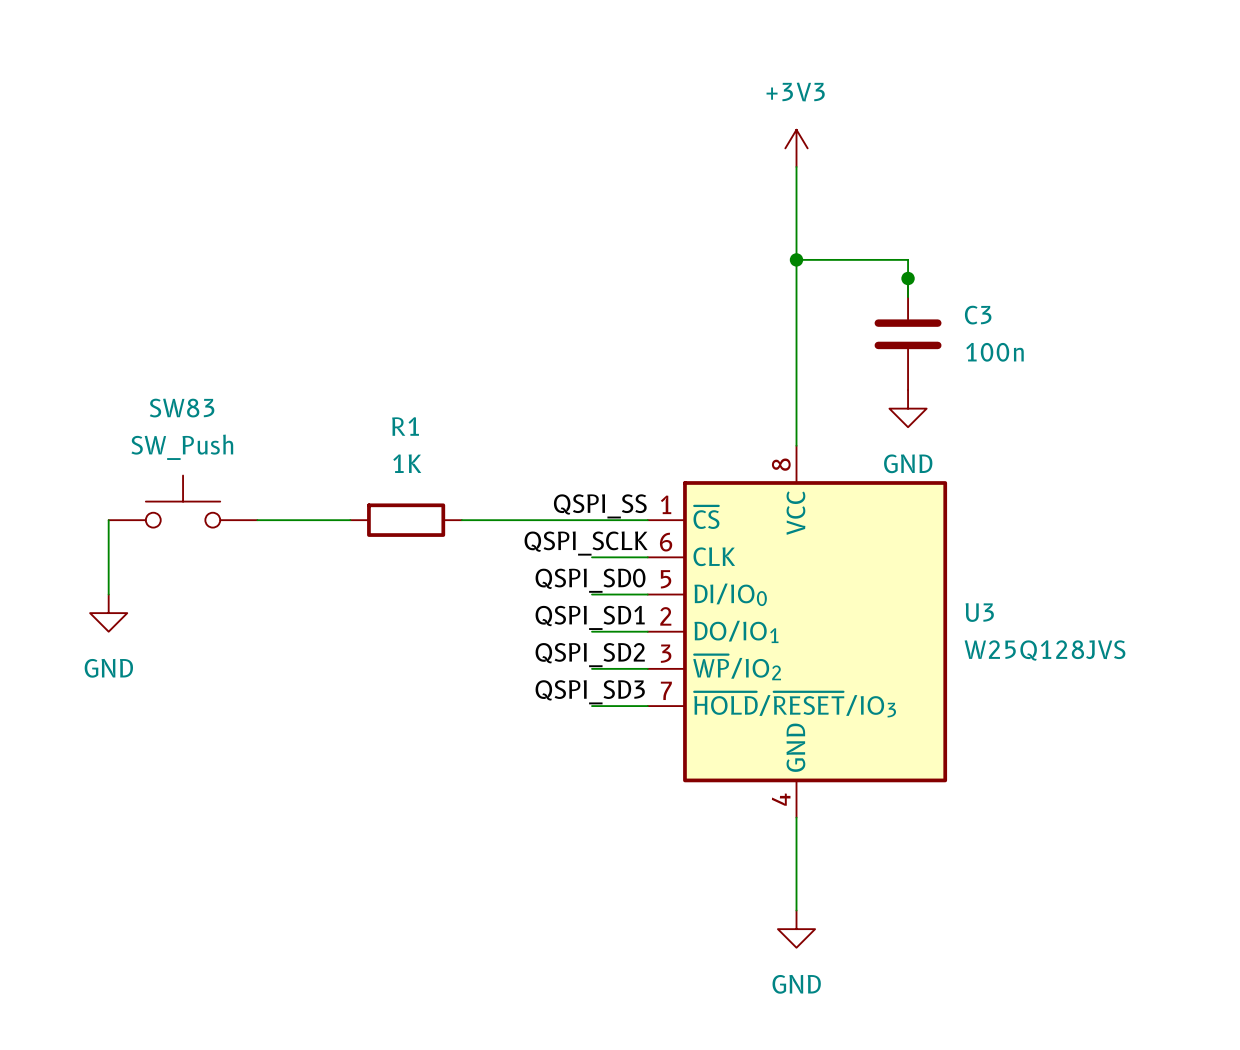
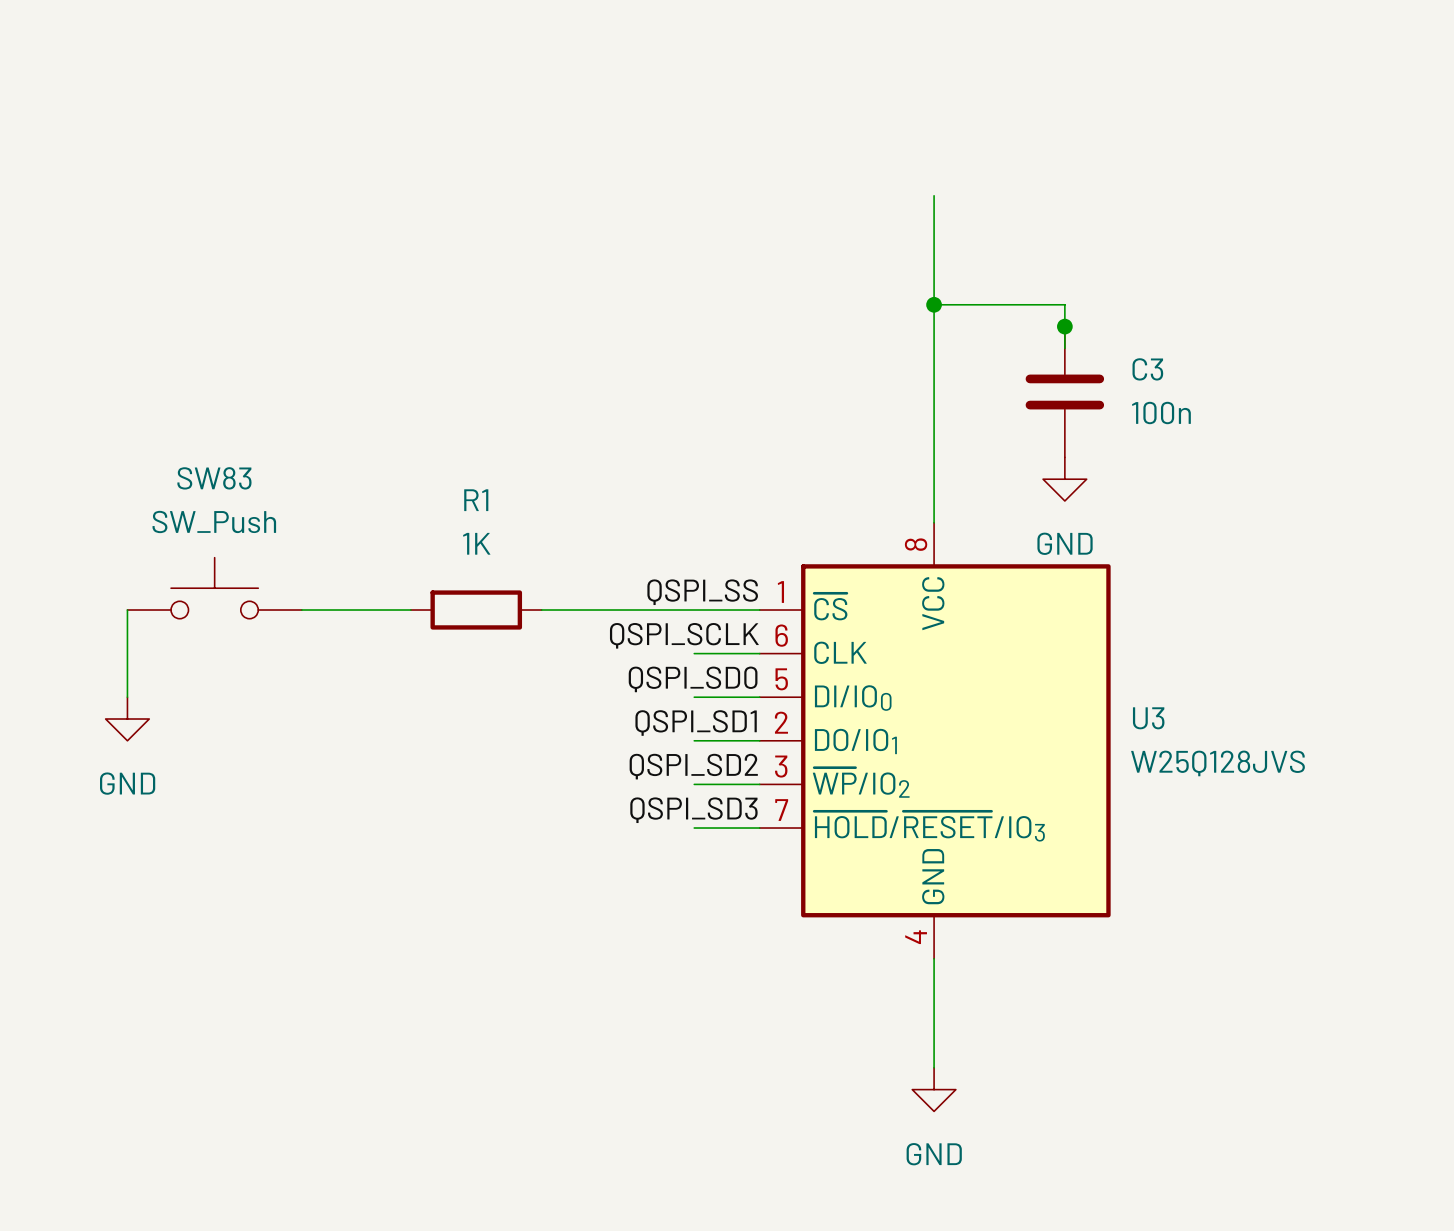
power symbol: +3V3 (796, 148) -> none

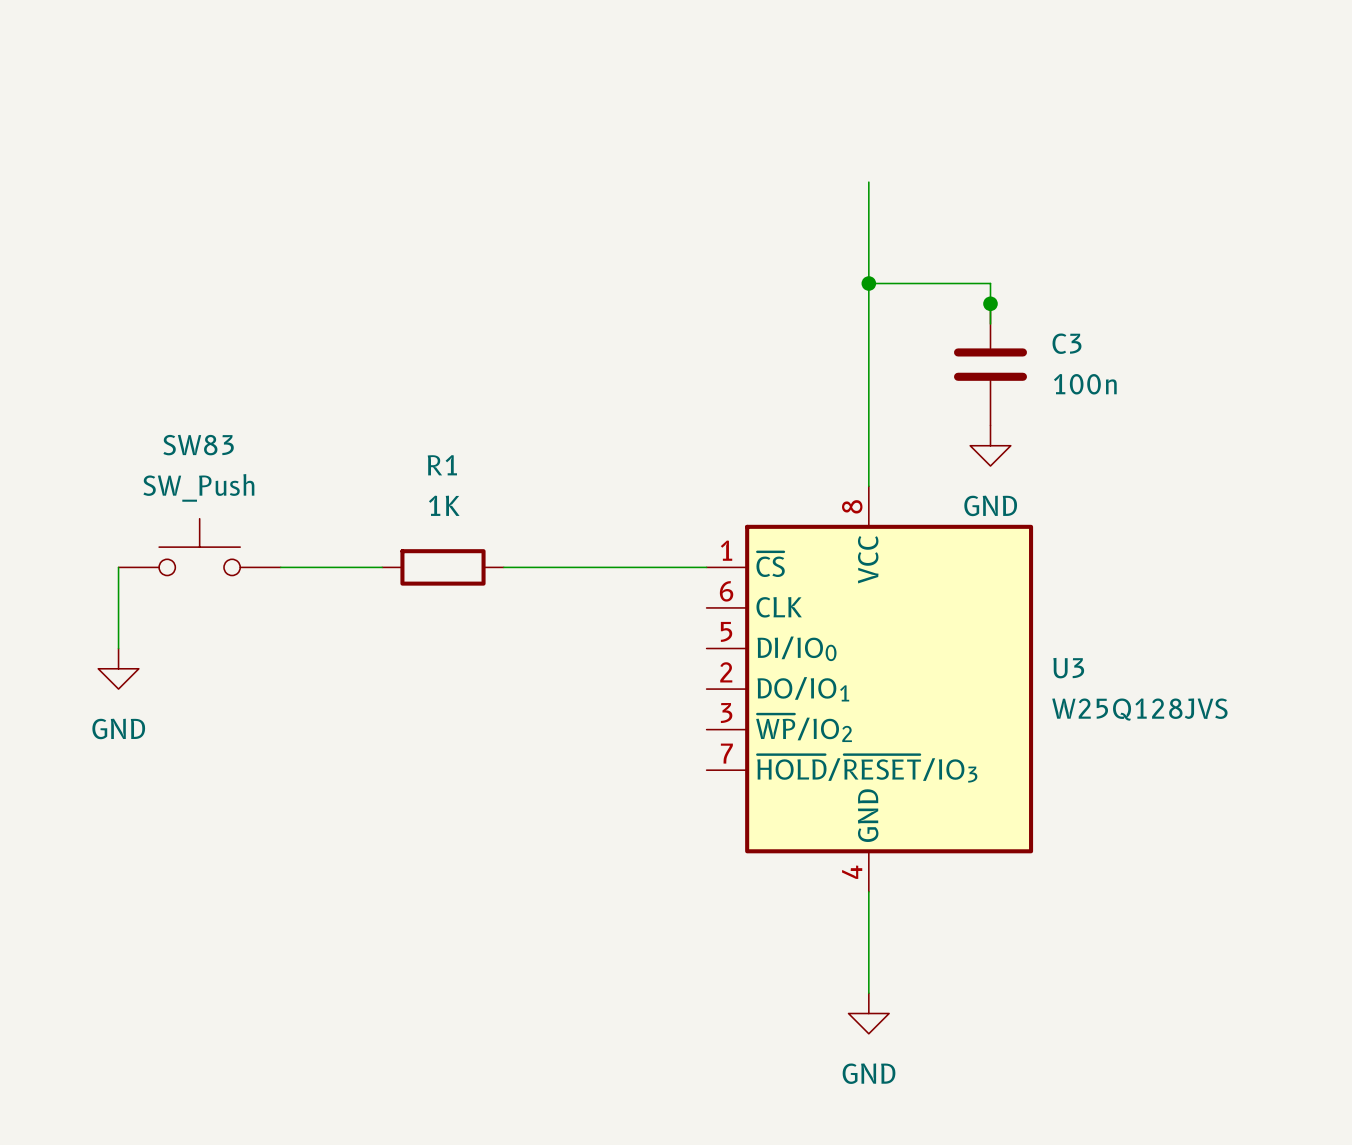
label: QSPI_SS (702, 592) -> none
label: QSPI_SCLK (684, 635) -> none
wire: (694, 653) (759, 653) -> none
label: QSPI_SD0 (693, 679) -> none
wire: (694, 697) (759, 697) -> none
label: QSPI_SD1 (696, 723) -> none
wire: (694, 740) (759, 740) -> none
label: QSPI_SD2 (693, 766) -> none
wire: (694, 784) (759, 784) -> none
label: QSPI_SD3 (693, 810) -> none
wire: (694, 828) (759, 828) -> none

